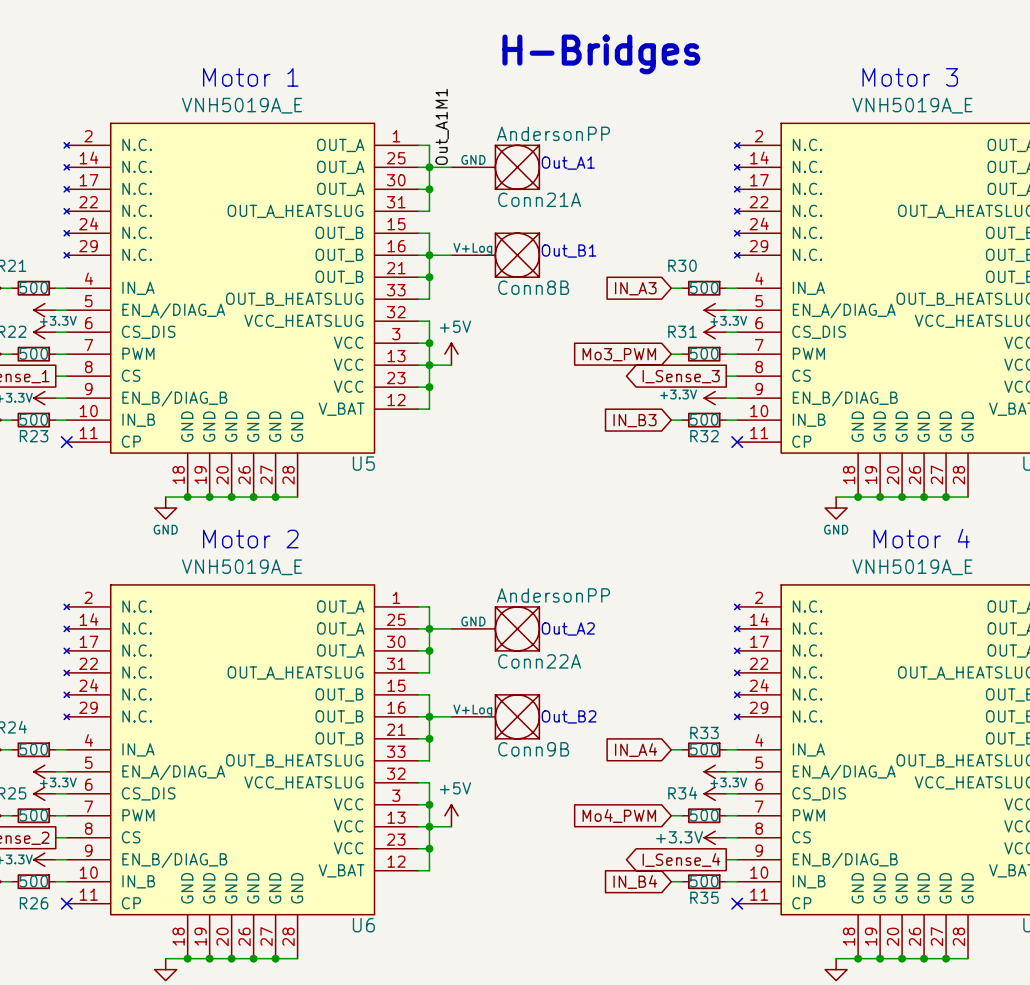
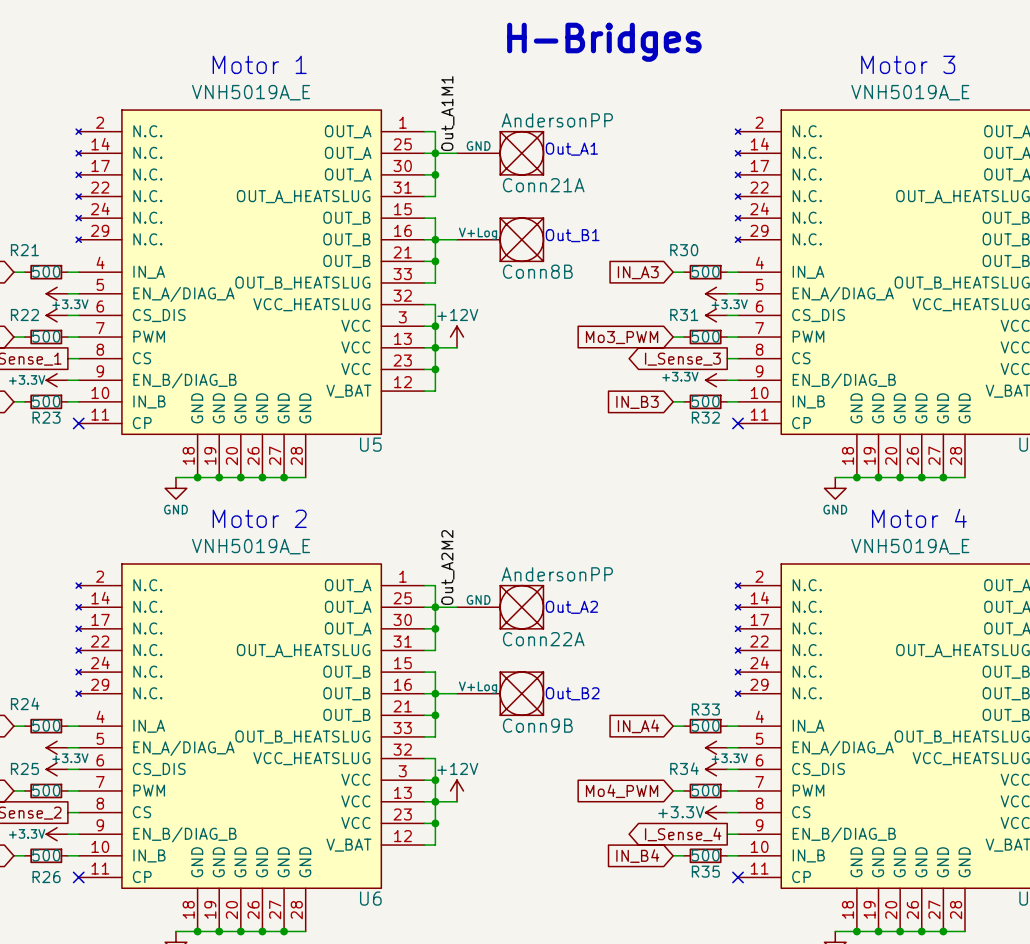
power symbol: +5V (451, 354) -> +12V (457, 337)
label: none -> Out_A2M2 (447, 567)
power symbol: +5V (451, 815) -> +12V (457, 790)

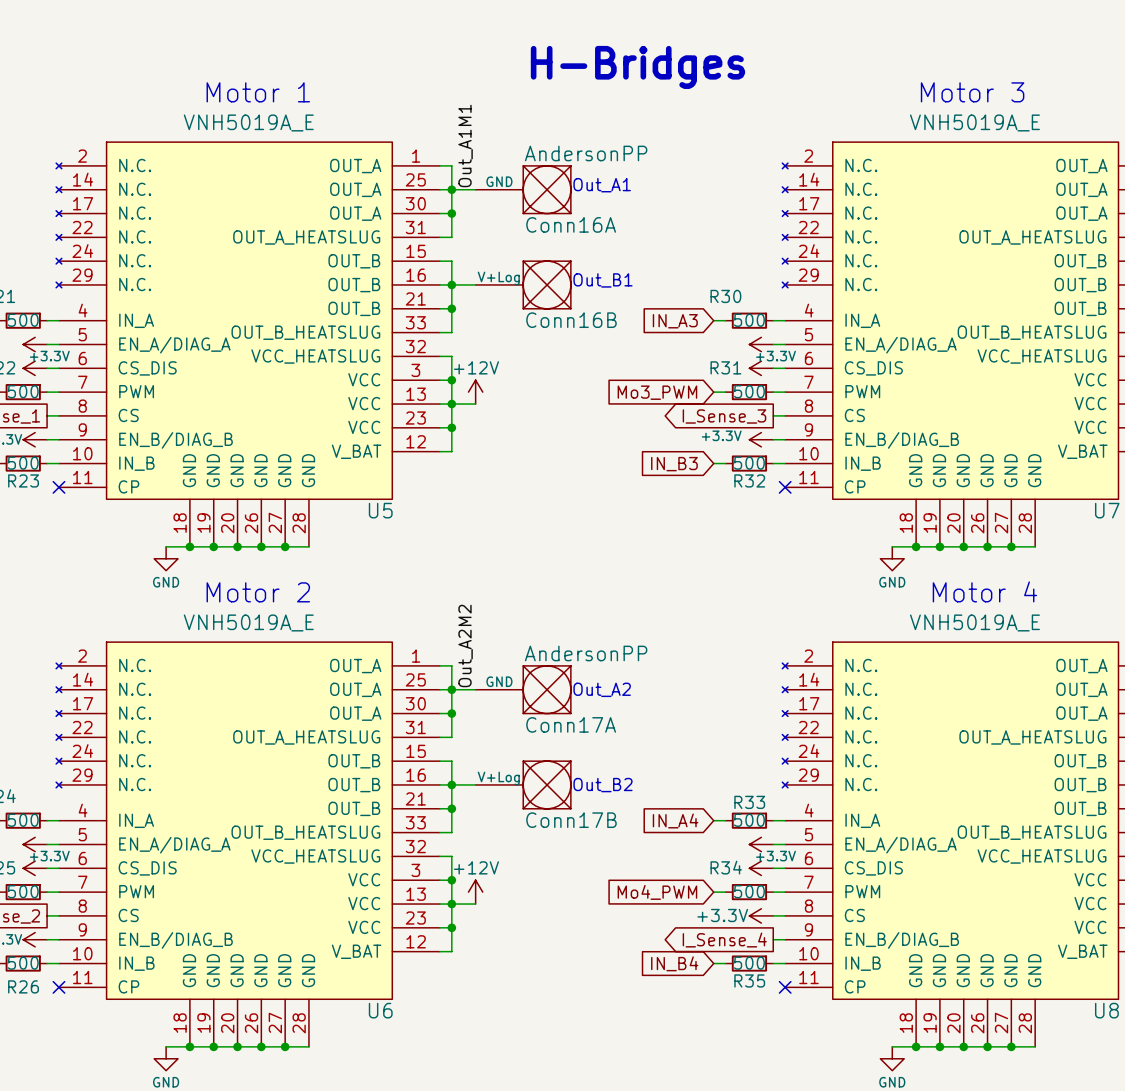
Conn21A name: Conn21A (543, 185) -> Conn16A (571, 224)
Conn8B name: Conn8B (537, 271) -> Conn16B (571, 320)
Conn22A name: Conn22A (543, 639) -> Conn17A (571, 724)
Conn9B name: Conn9B (537, 725) -> Conn17B (571, 820)

